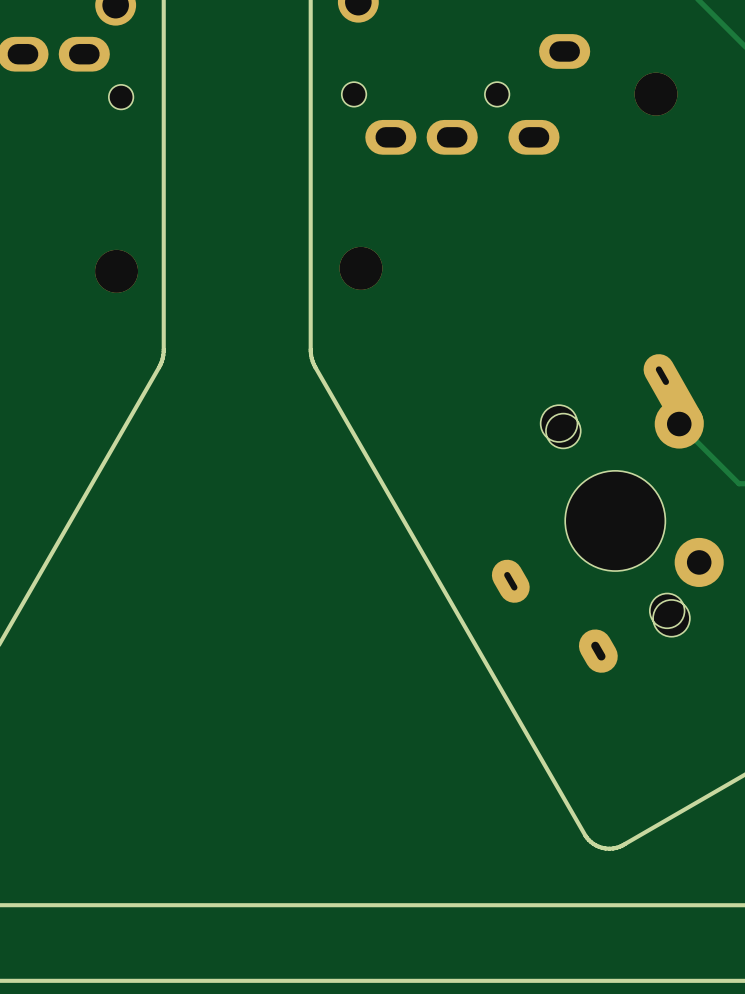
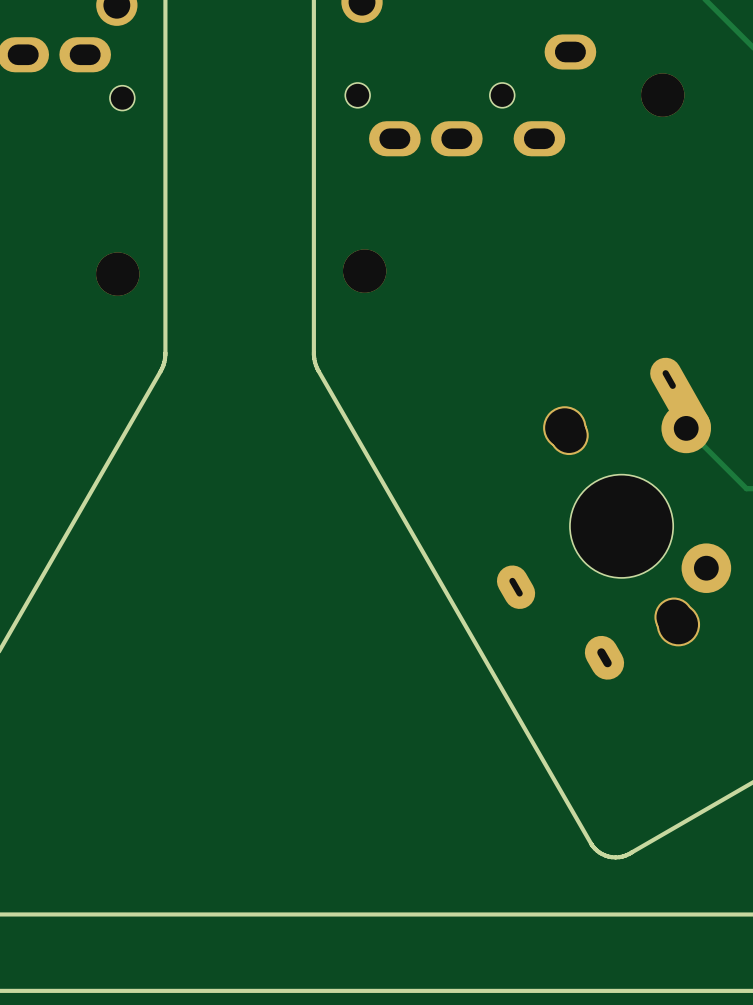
part footprint: [491, 354, 724, 673] -> [496, 357, 732, 680]

